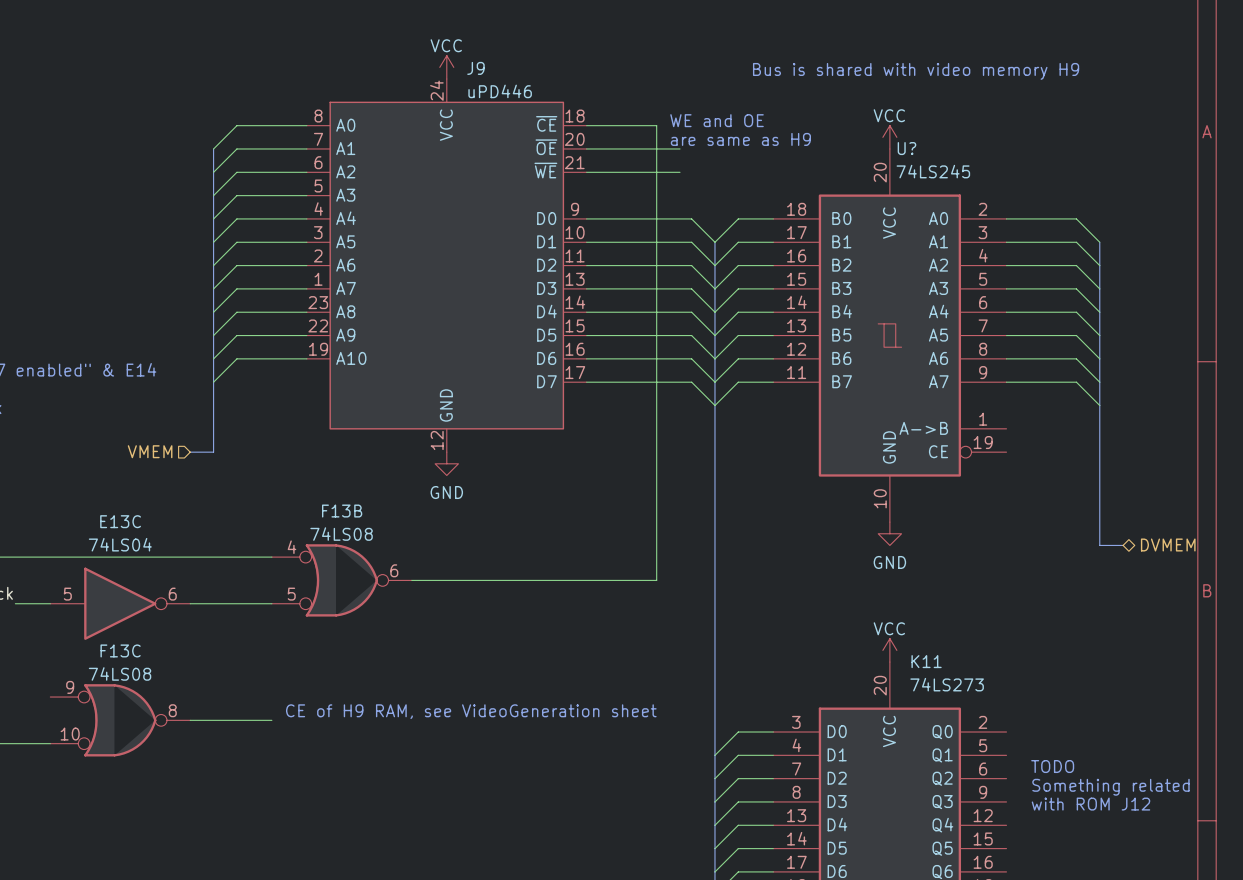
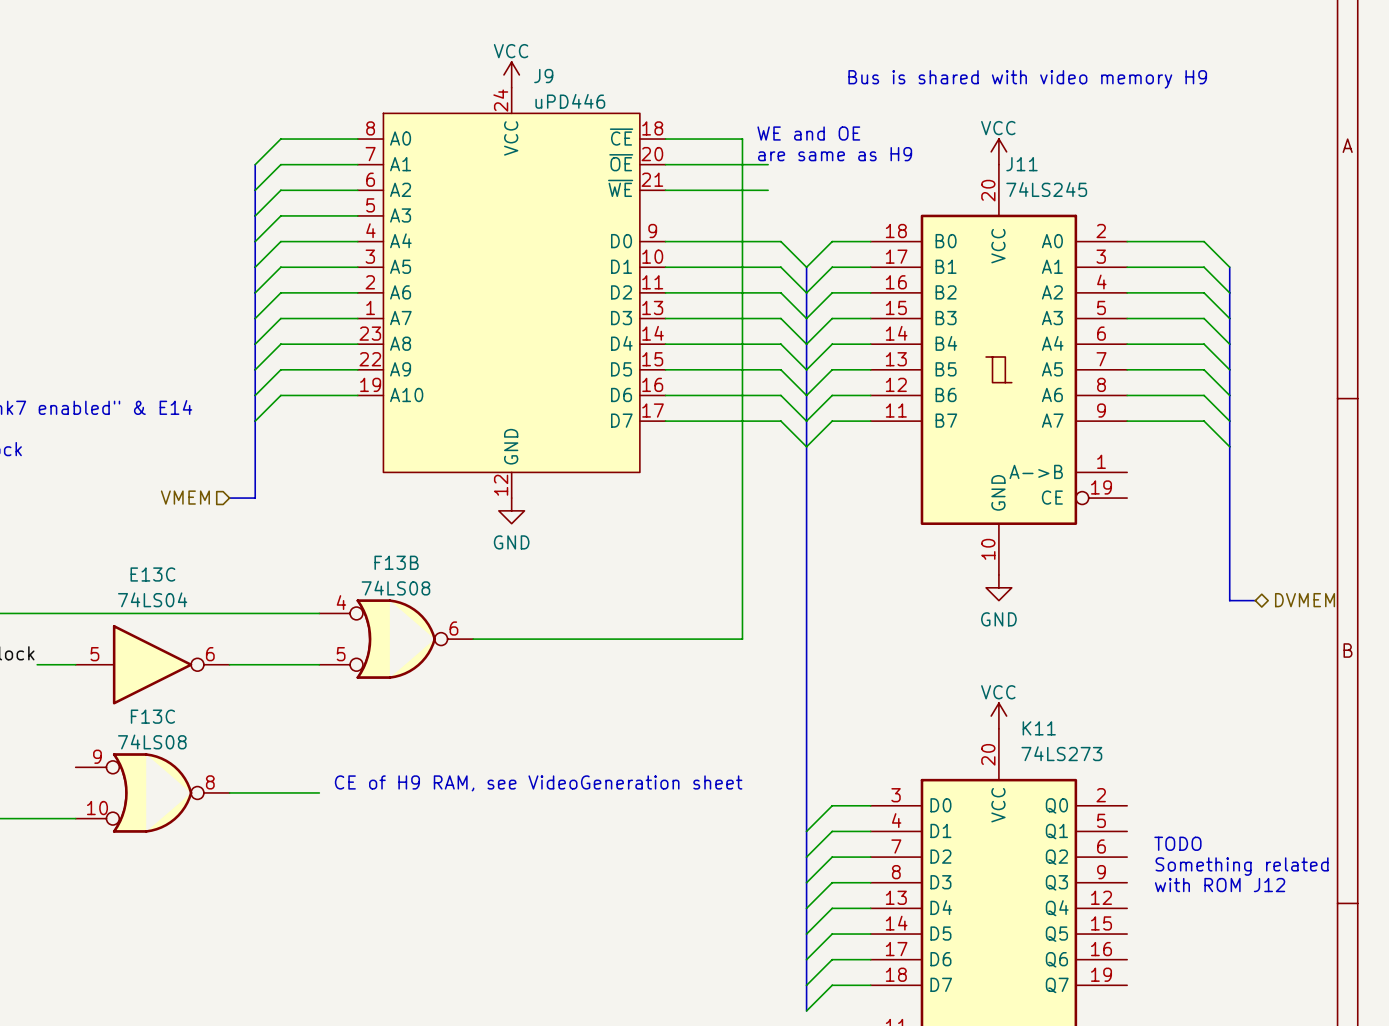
U? name: U? (906, 148) -> J11 (1021, 164)

